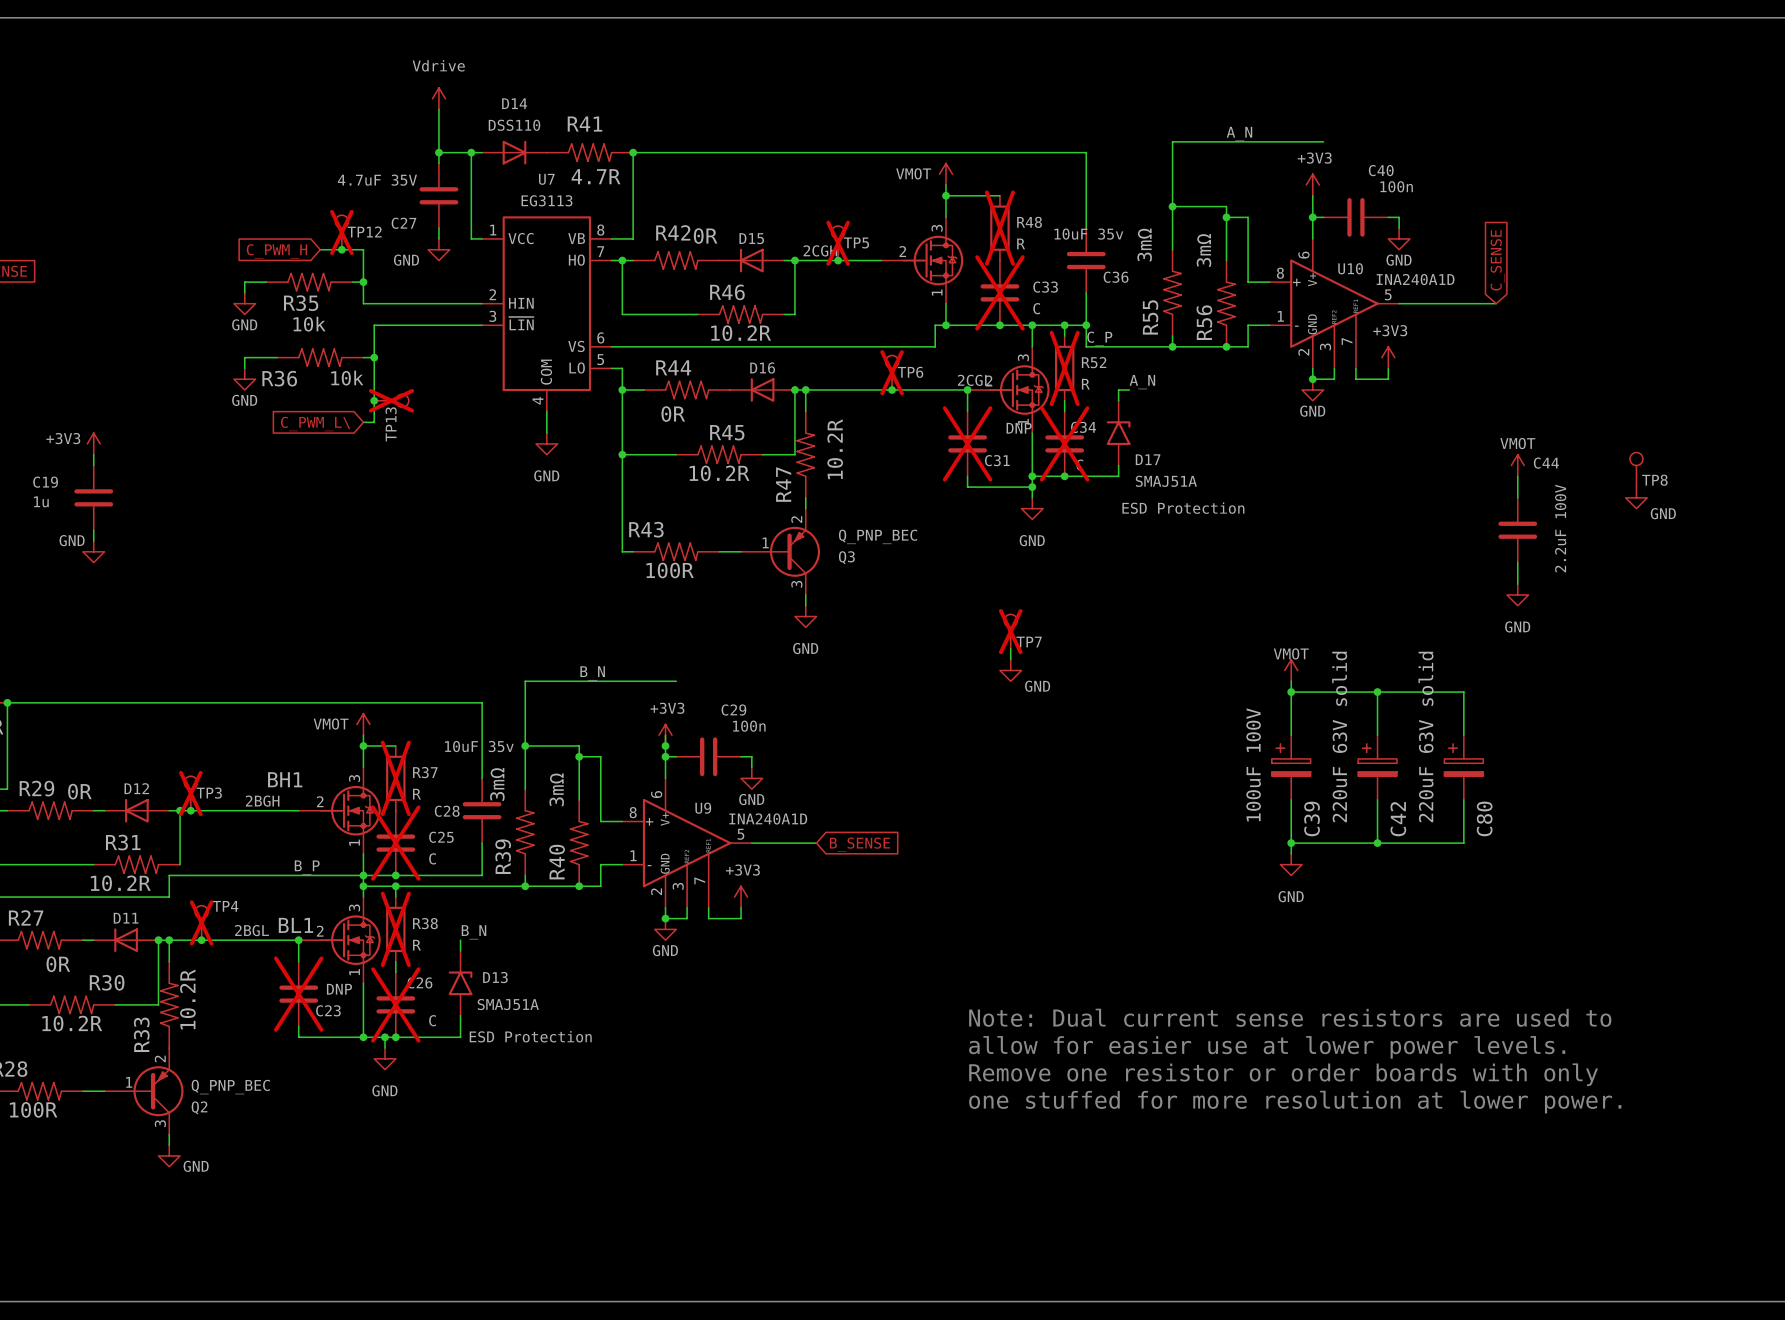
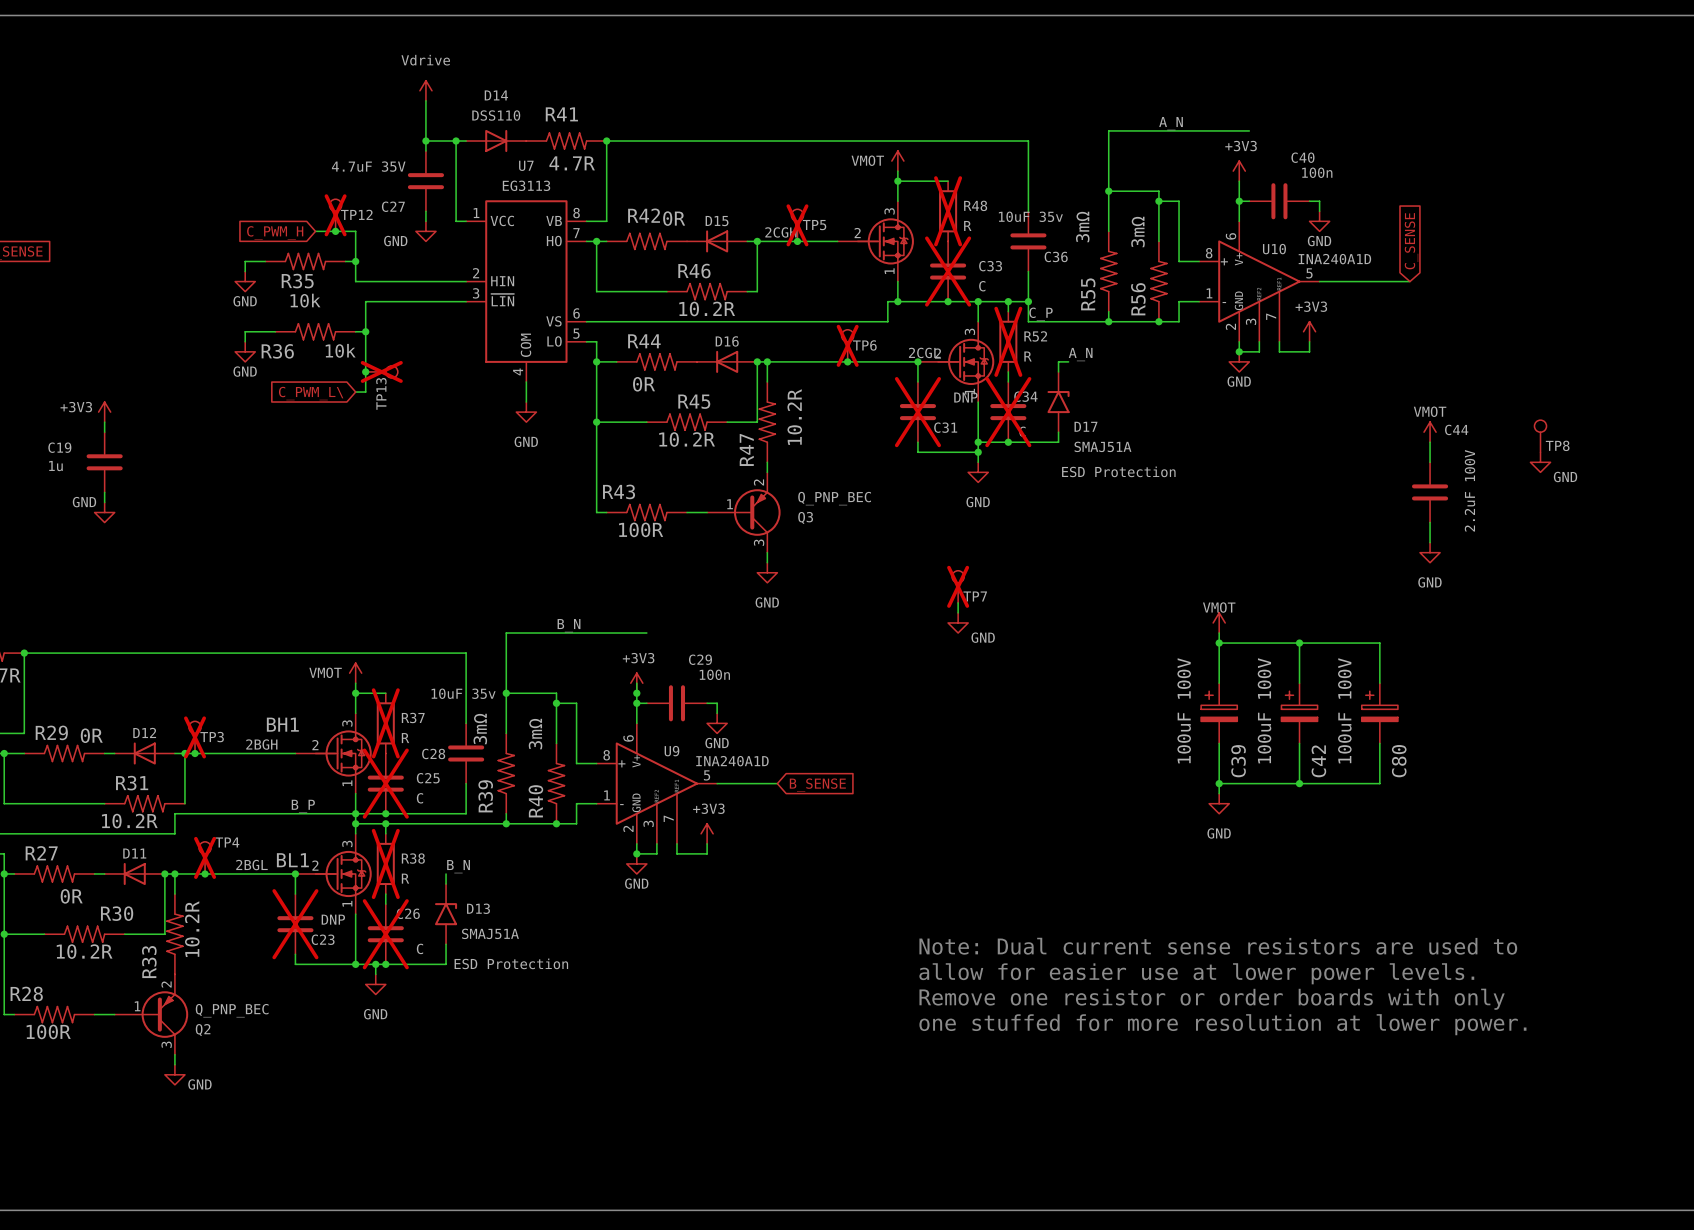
C42 value: 220uF 63V solid (1339, 737) -> 100uF 100V (1264, 710)
C80 value: 220uF 63V solid (1425, 737) -> 100uF 100V (1344, 710)

